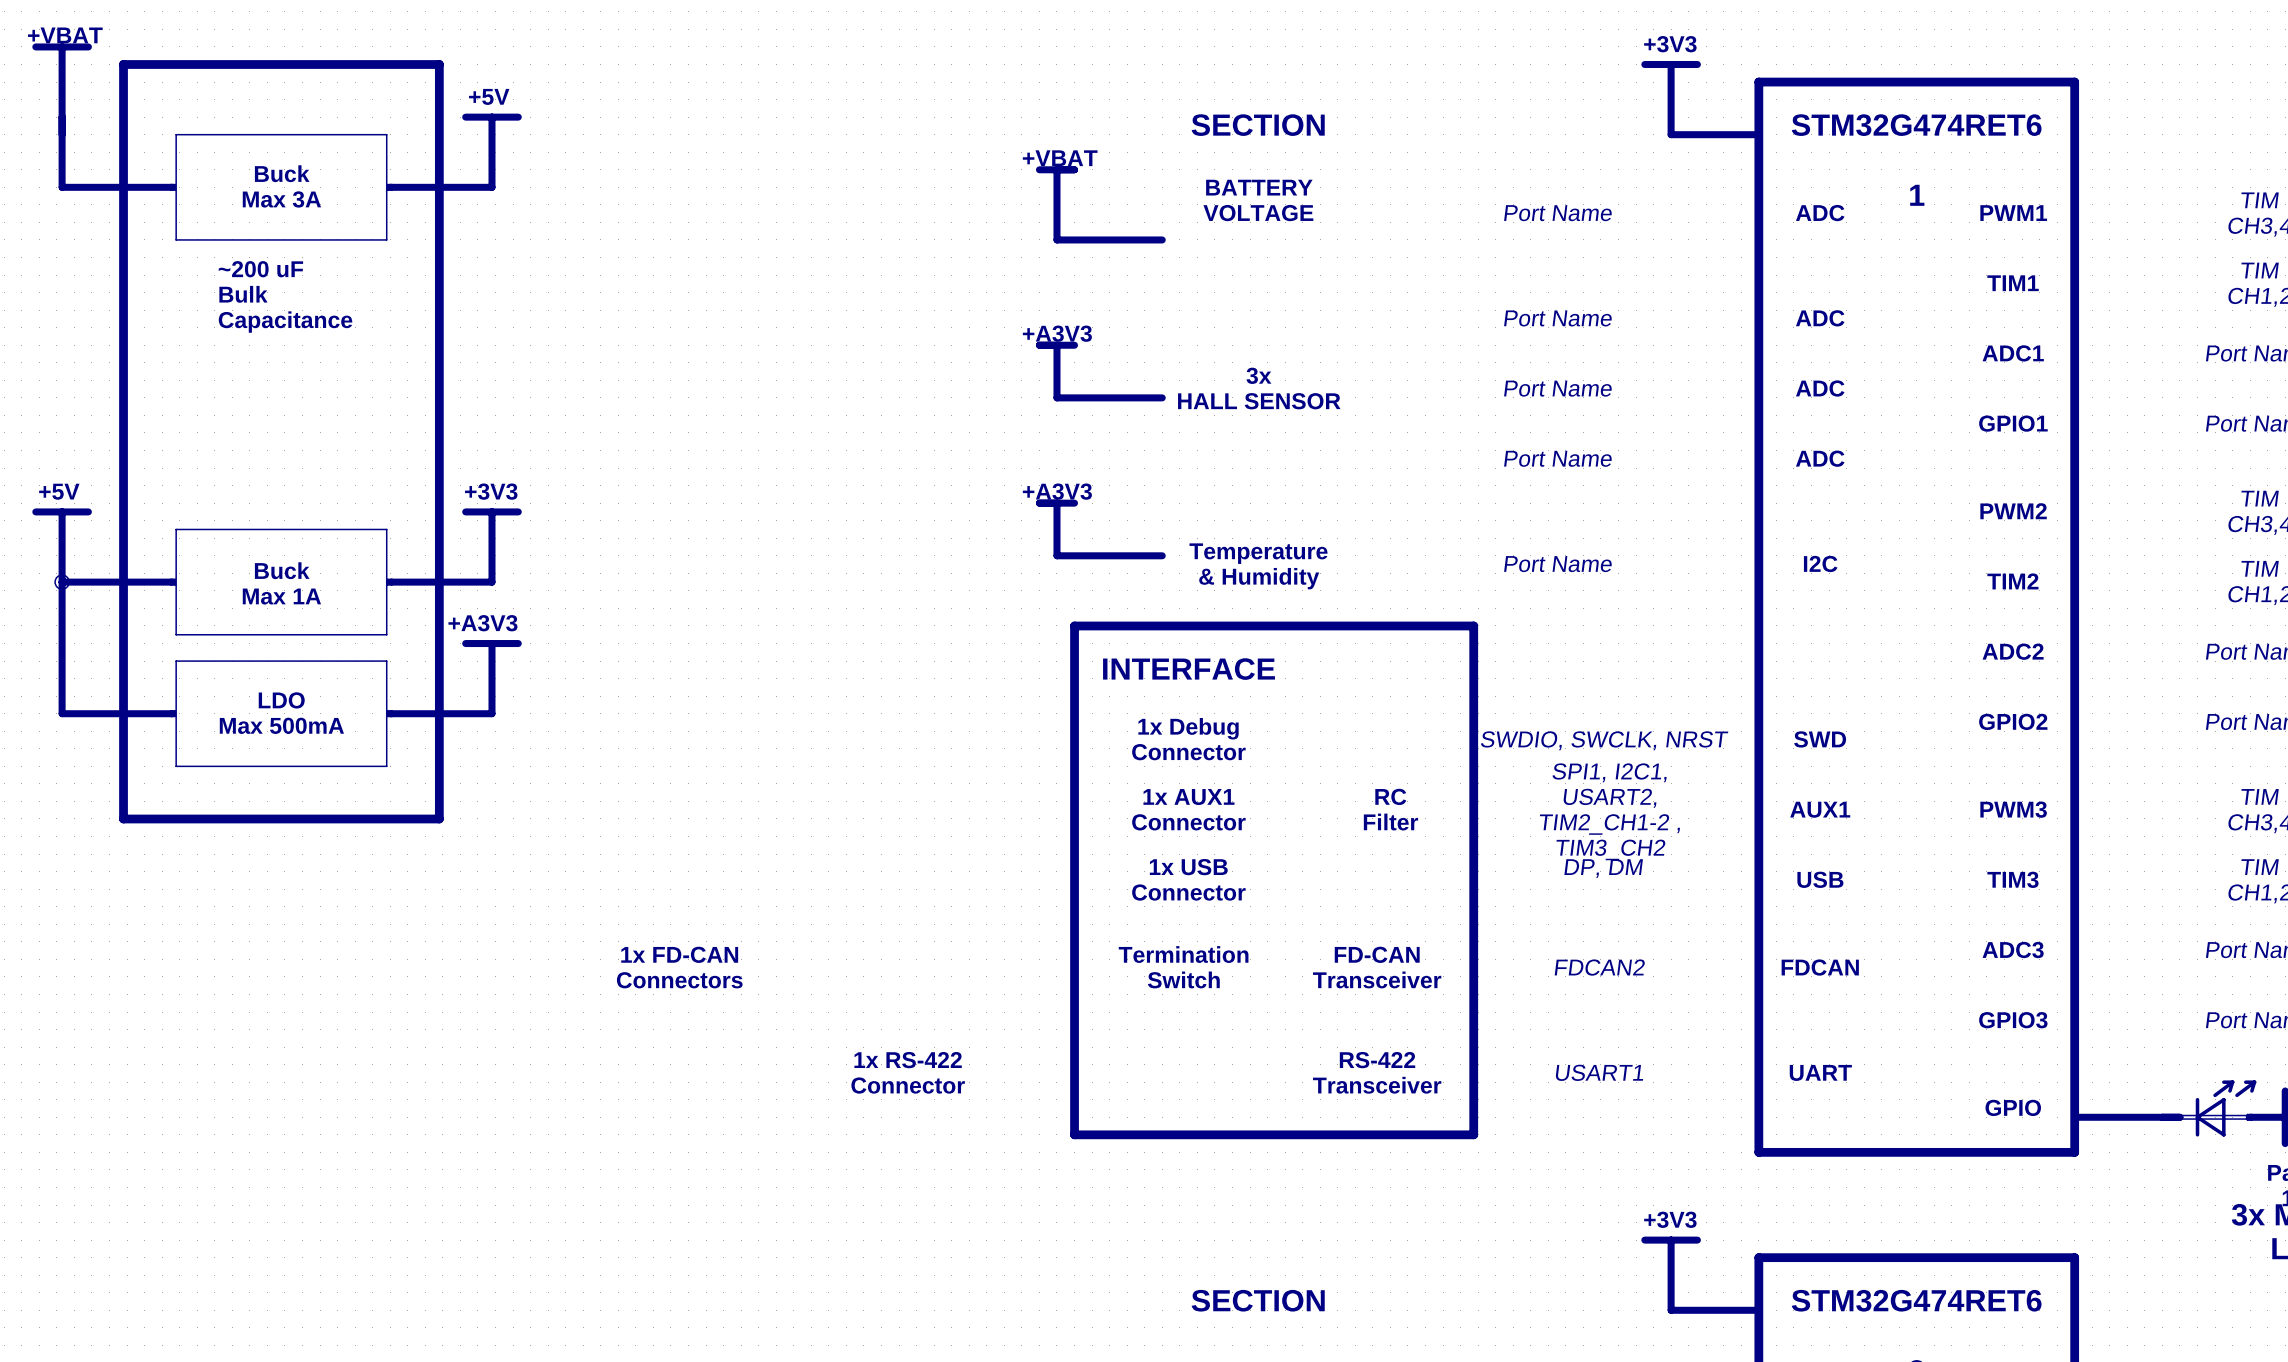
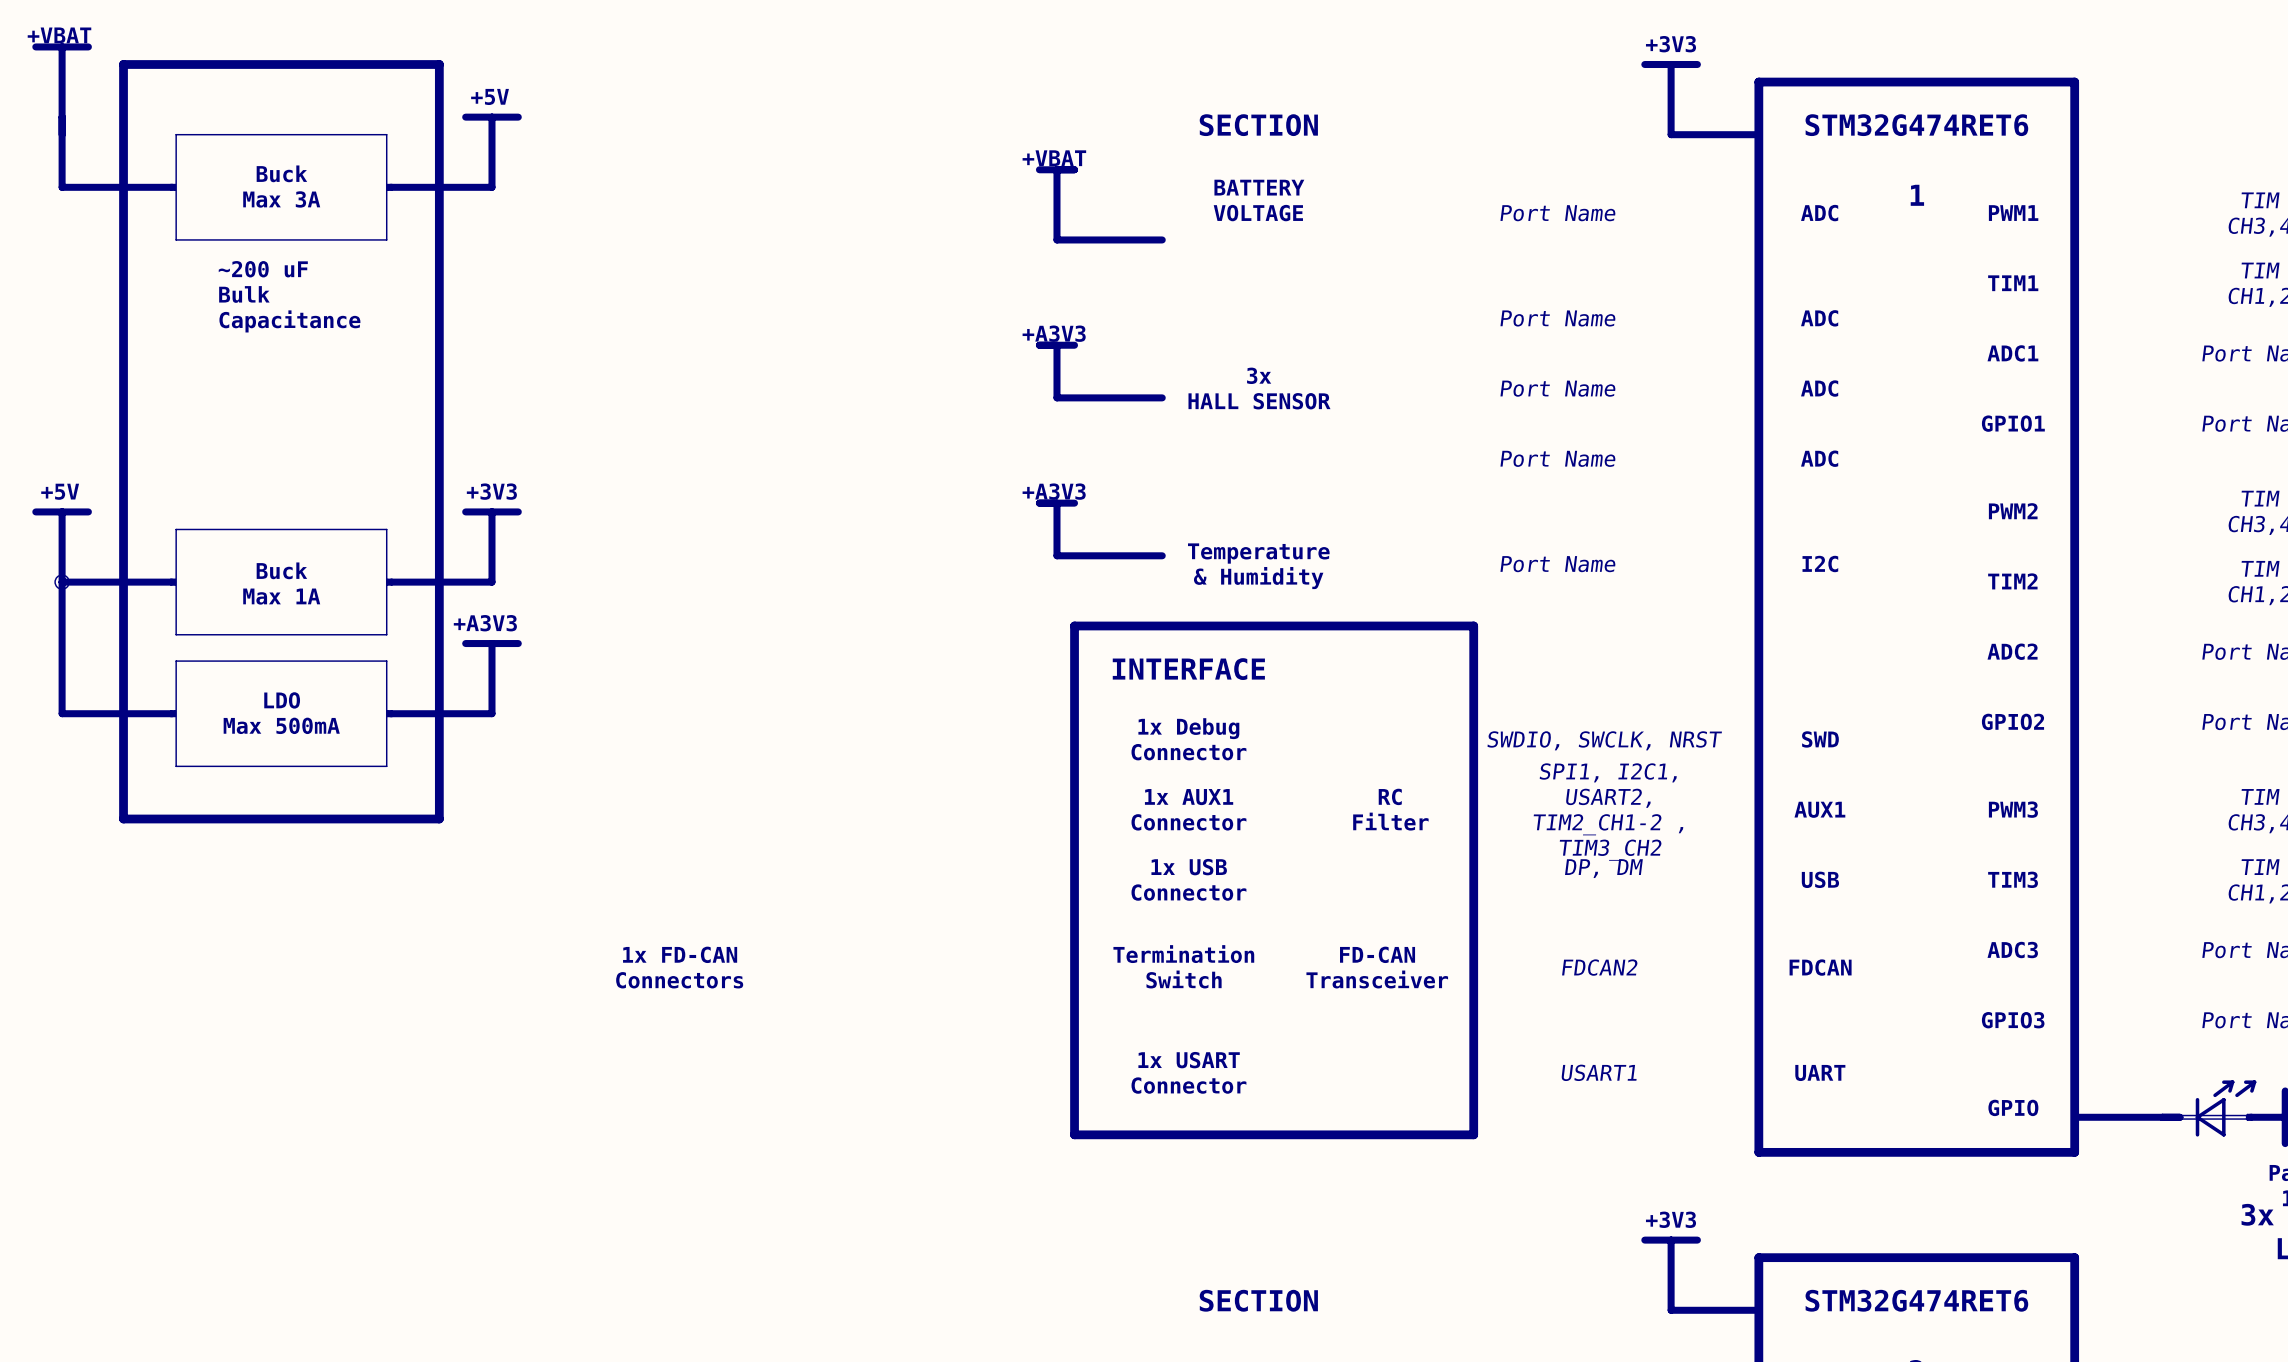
text: 1x RS-422 (908, 1060) -> none
text: none -> 1x USART (1189, 1060)
text: RS-422 (1377, 1060) -> none
text: Connector (908, 1085) -> none
text: none -> Connector (1188, 1085)
text: Transceiver (1377, 1085) -> none

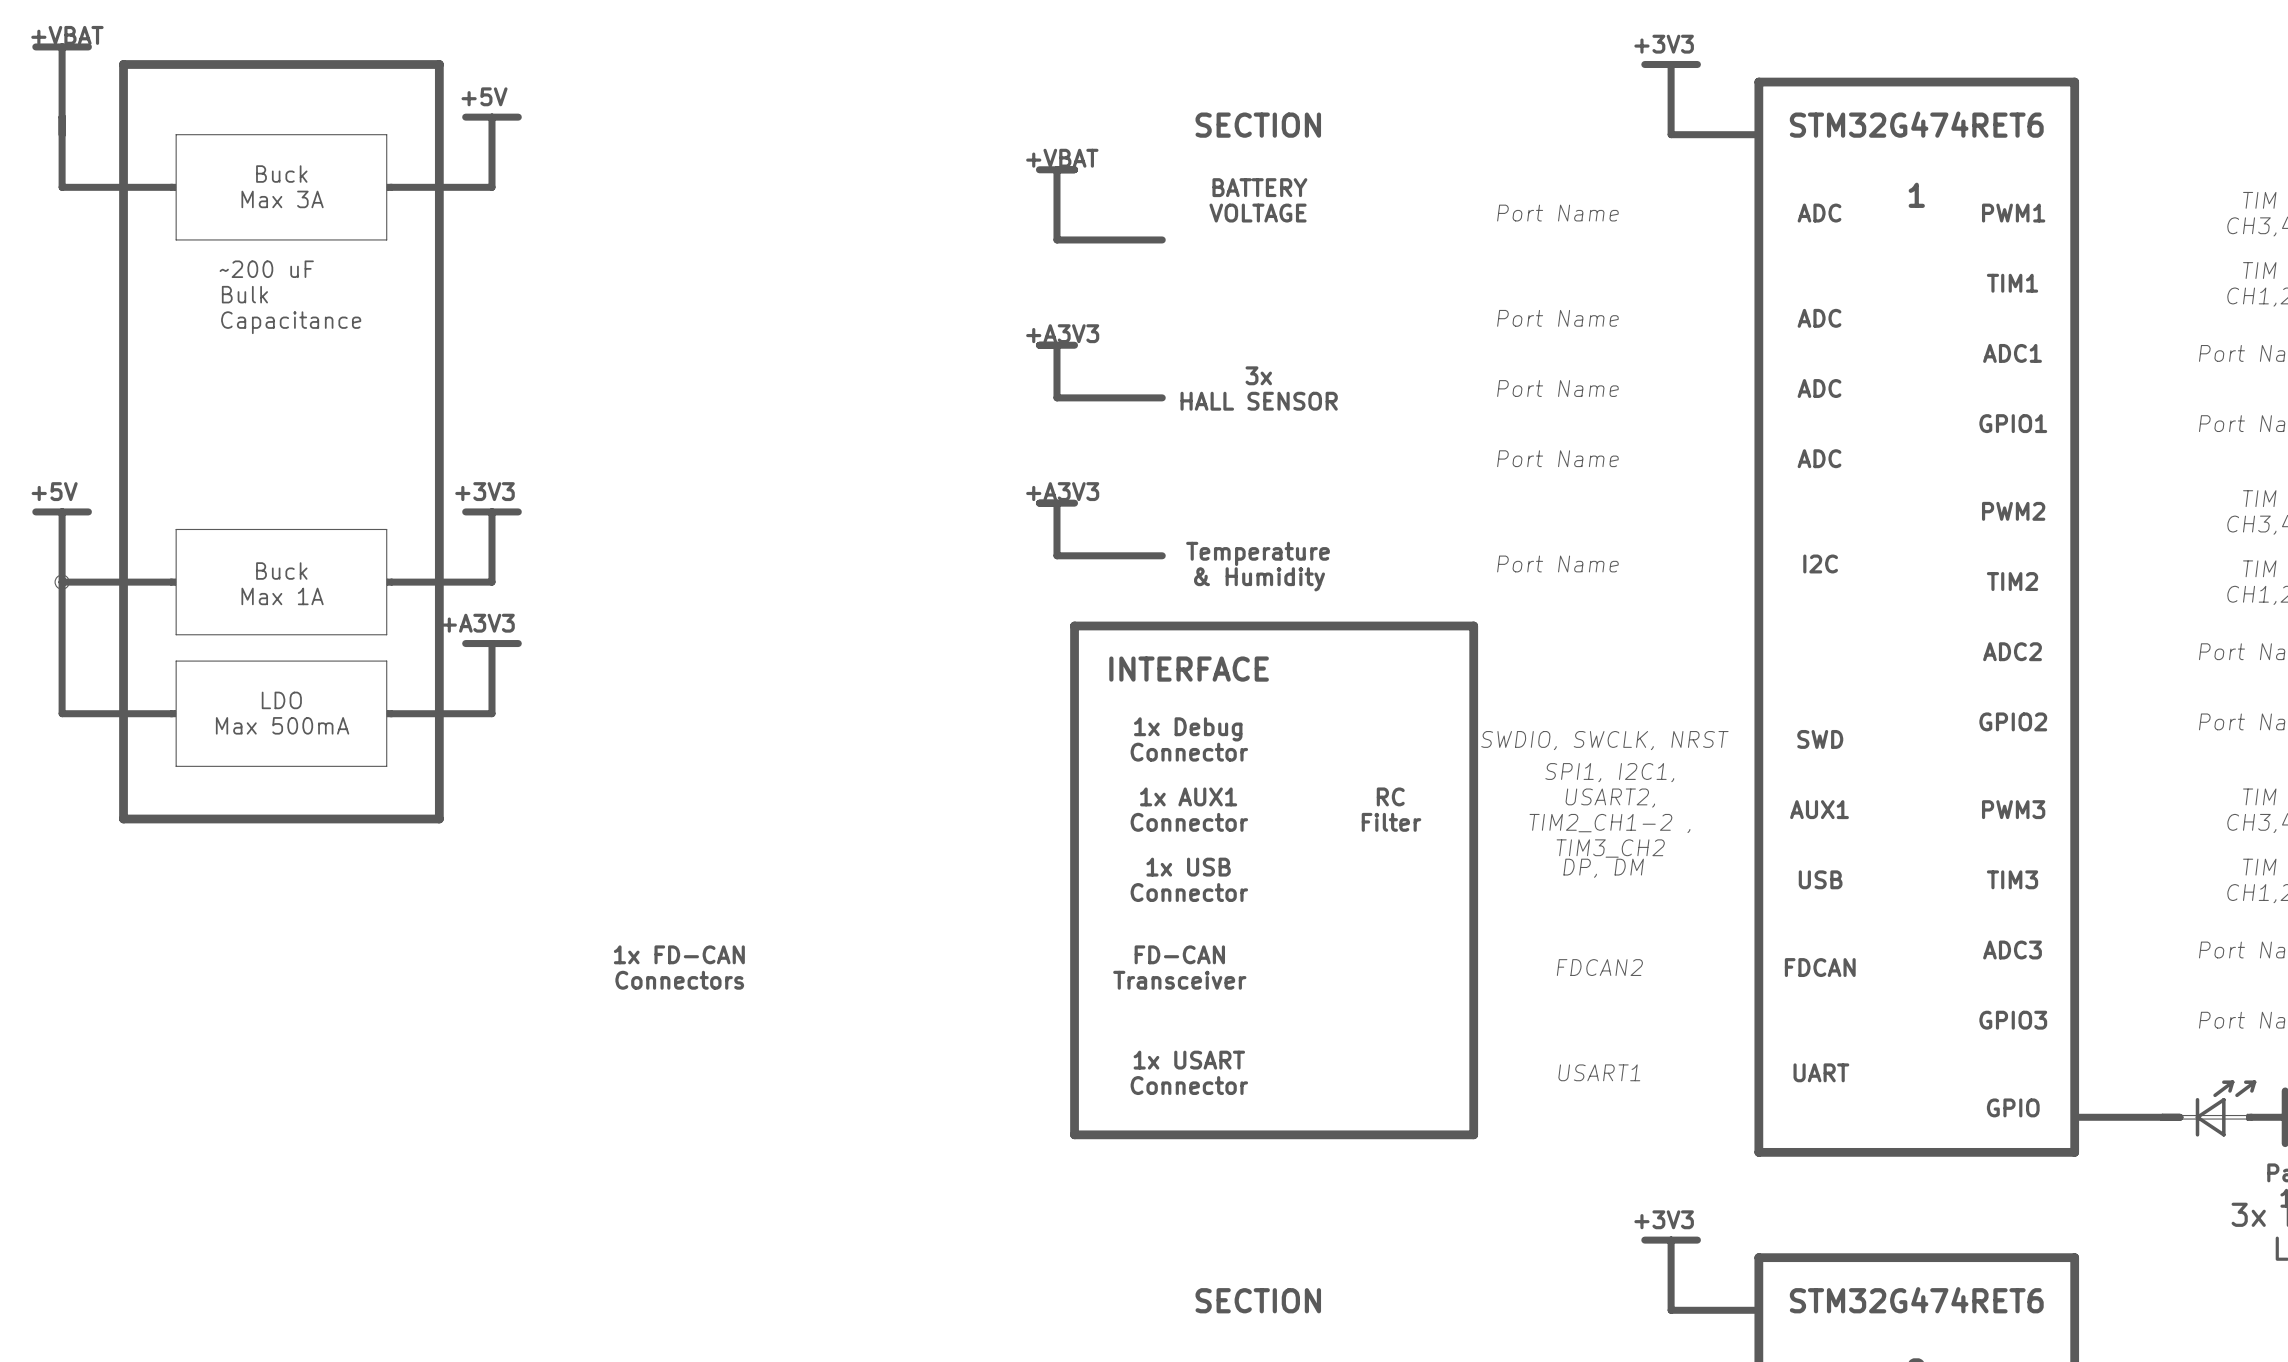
text: Termination (1183, 954) -> FD-CAN (1179, 954)
text: FD-CAN (1377, 954) -> none
text: Switch (1184, 979) -> Transceiver (1179, 980)
text: Transceiver (1377, 979) -> none

